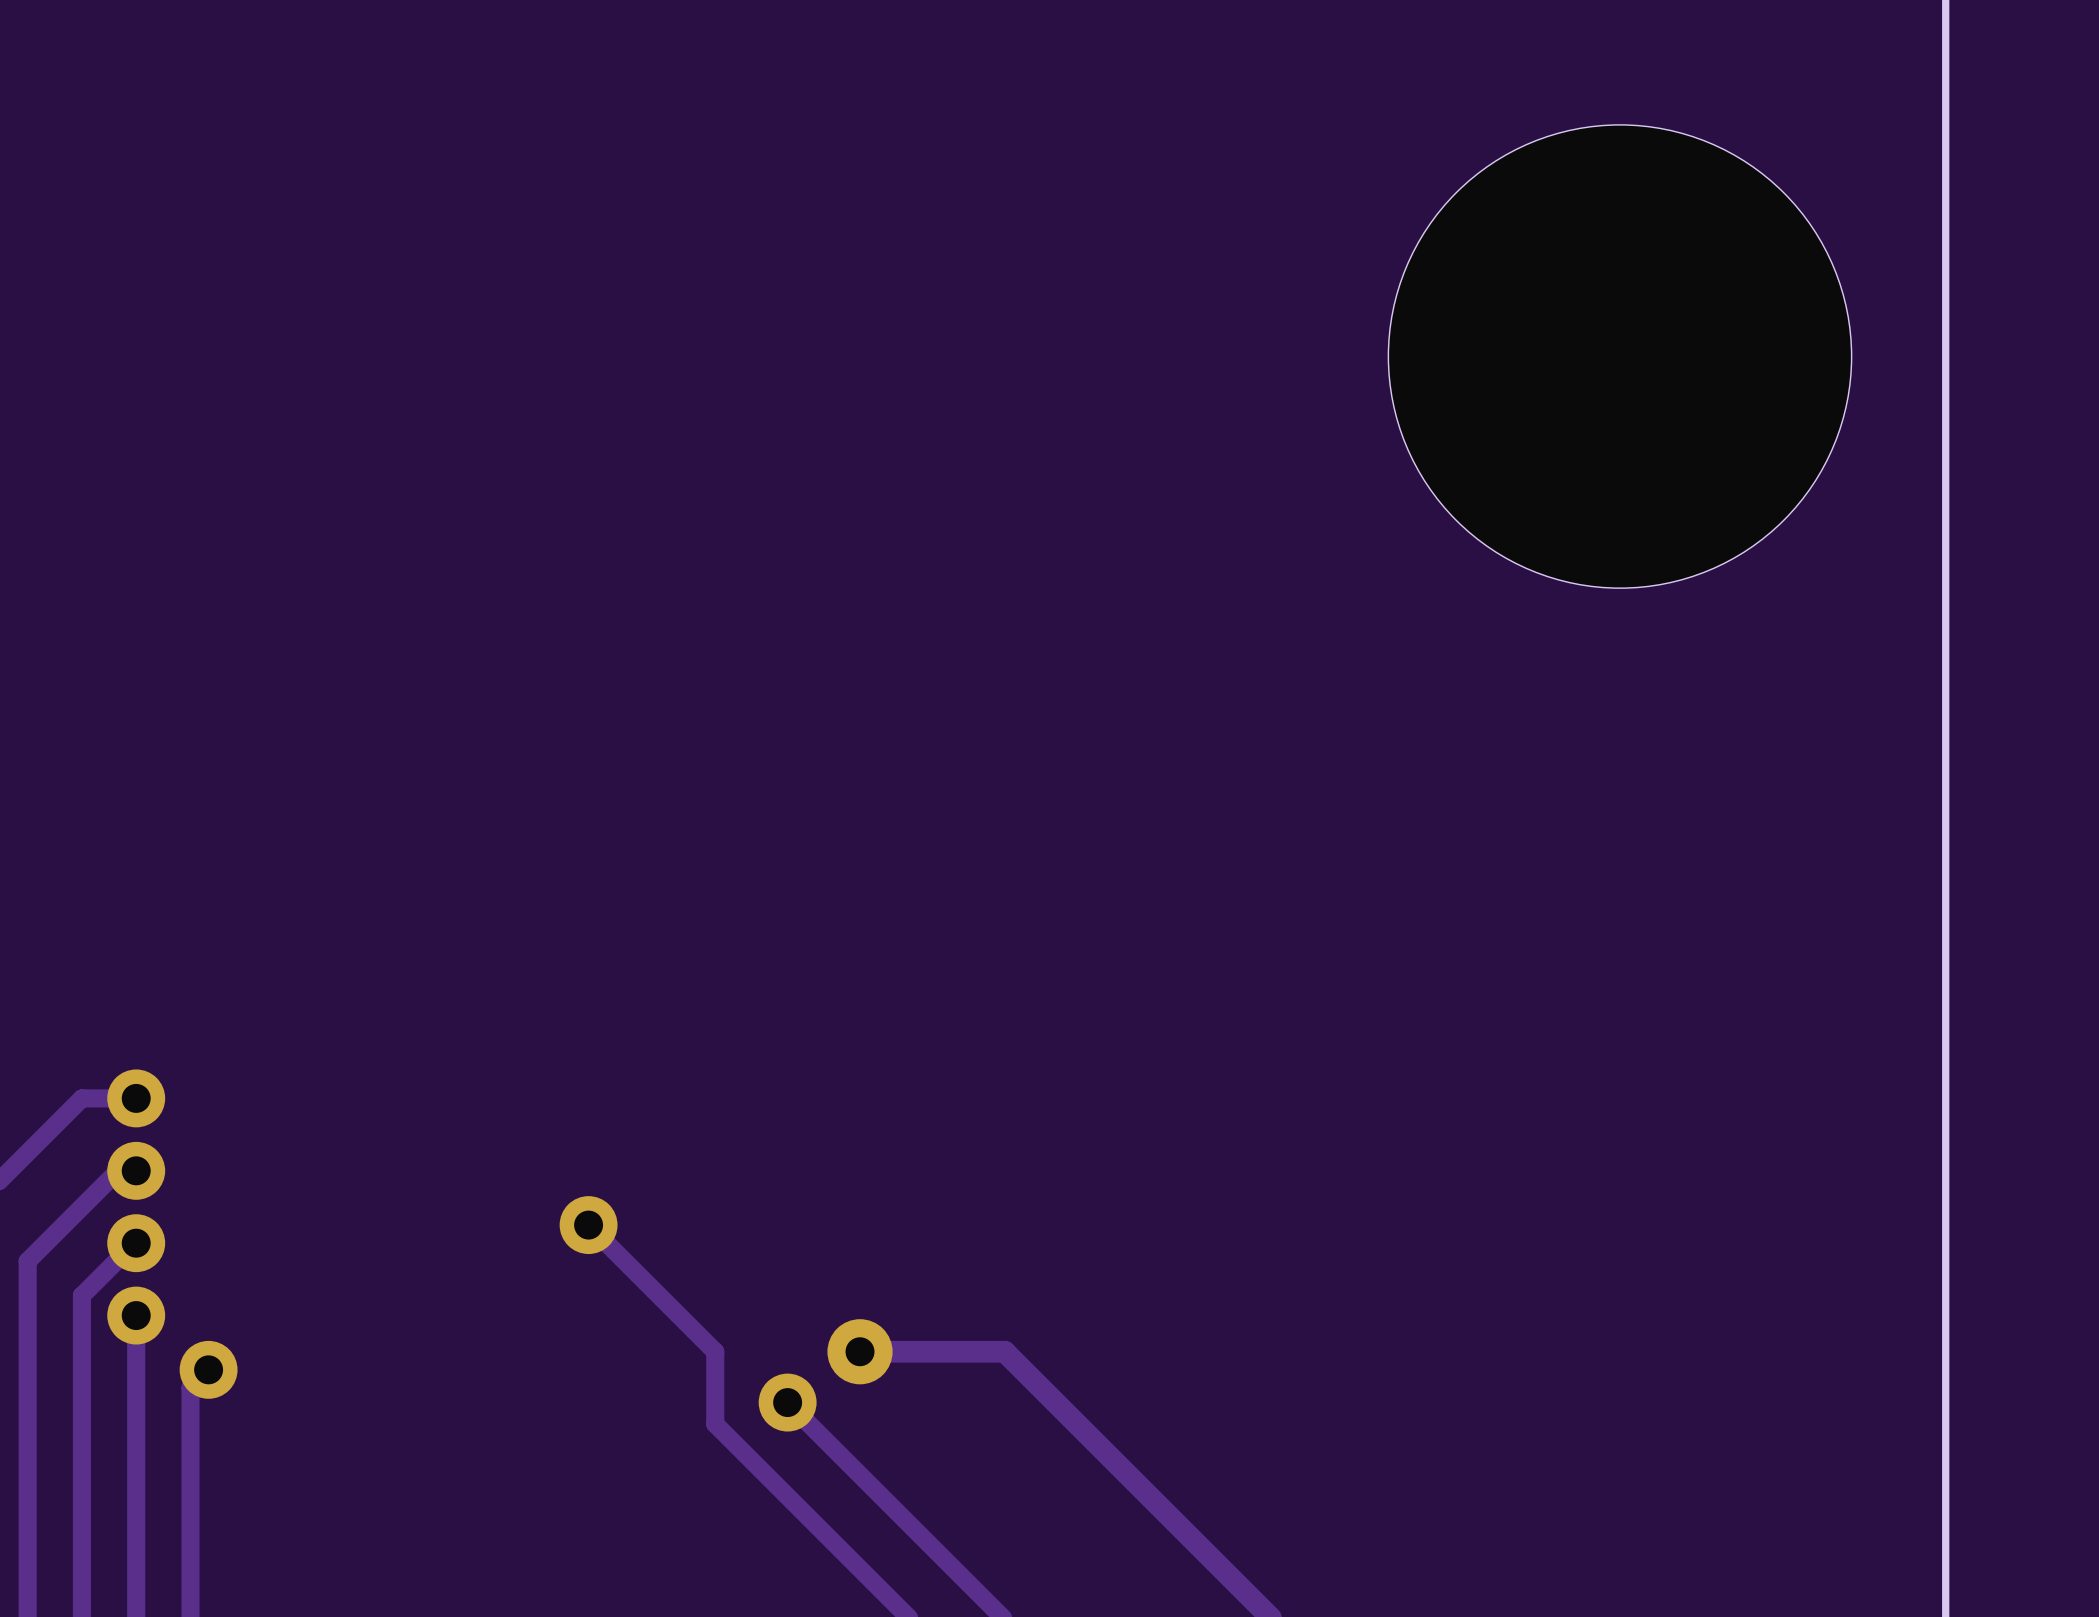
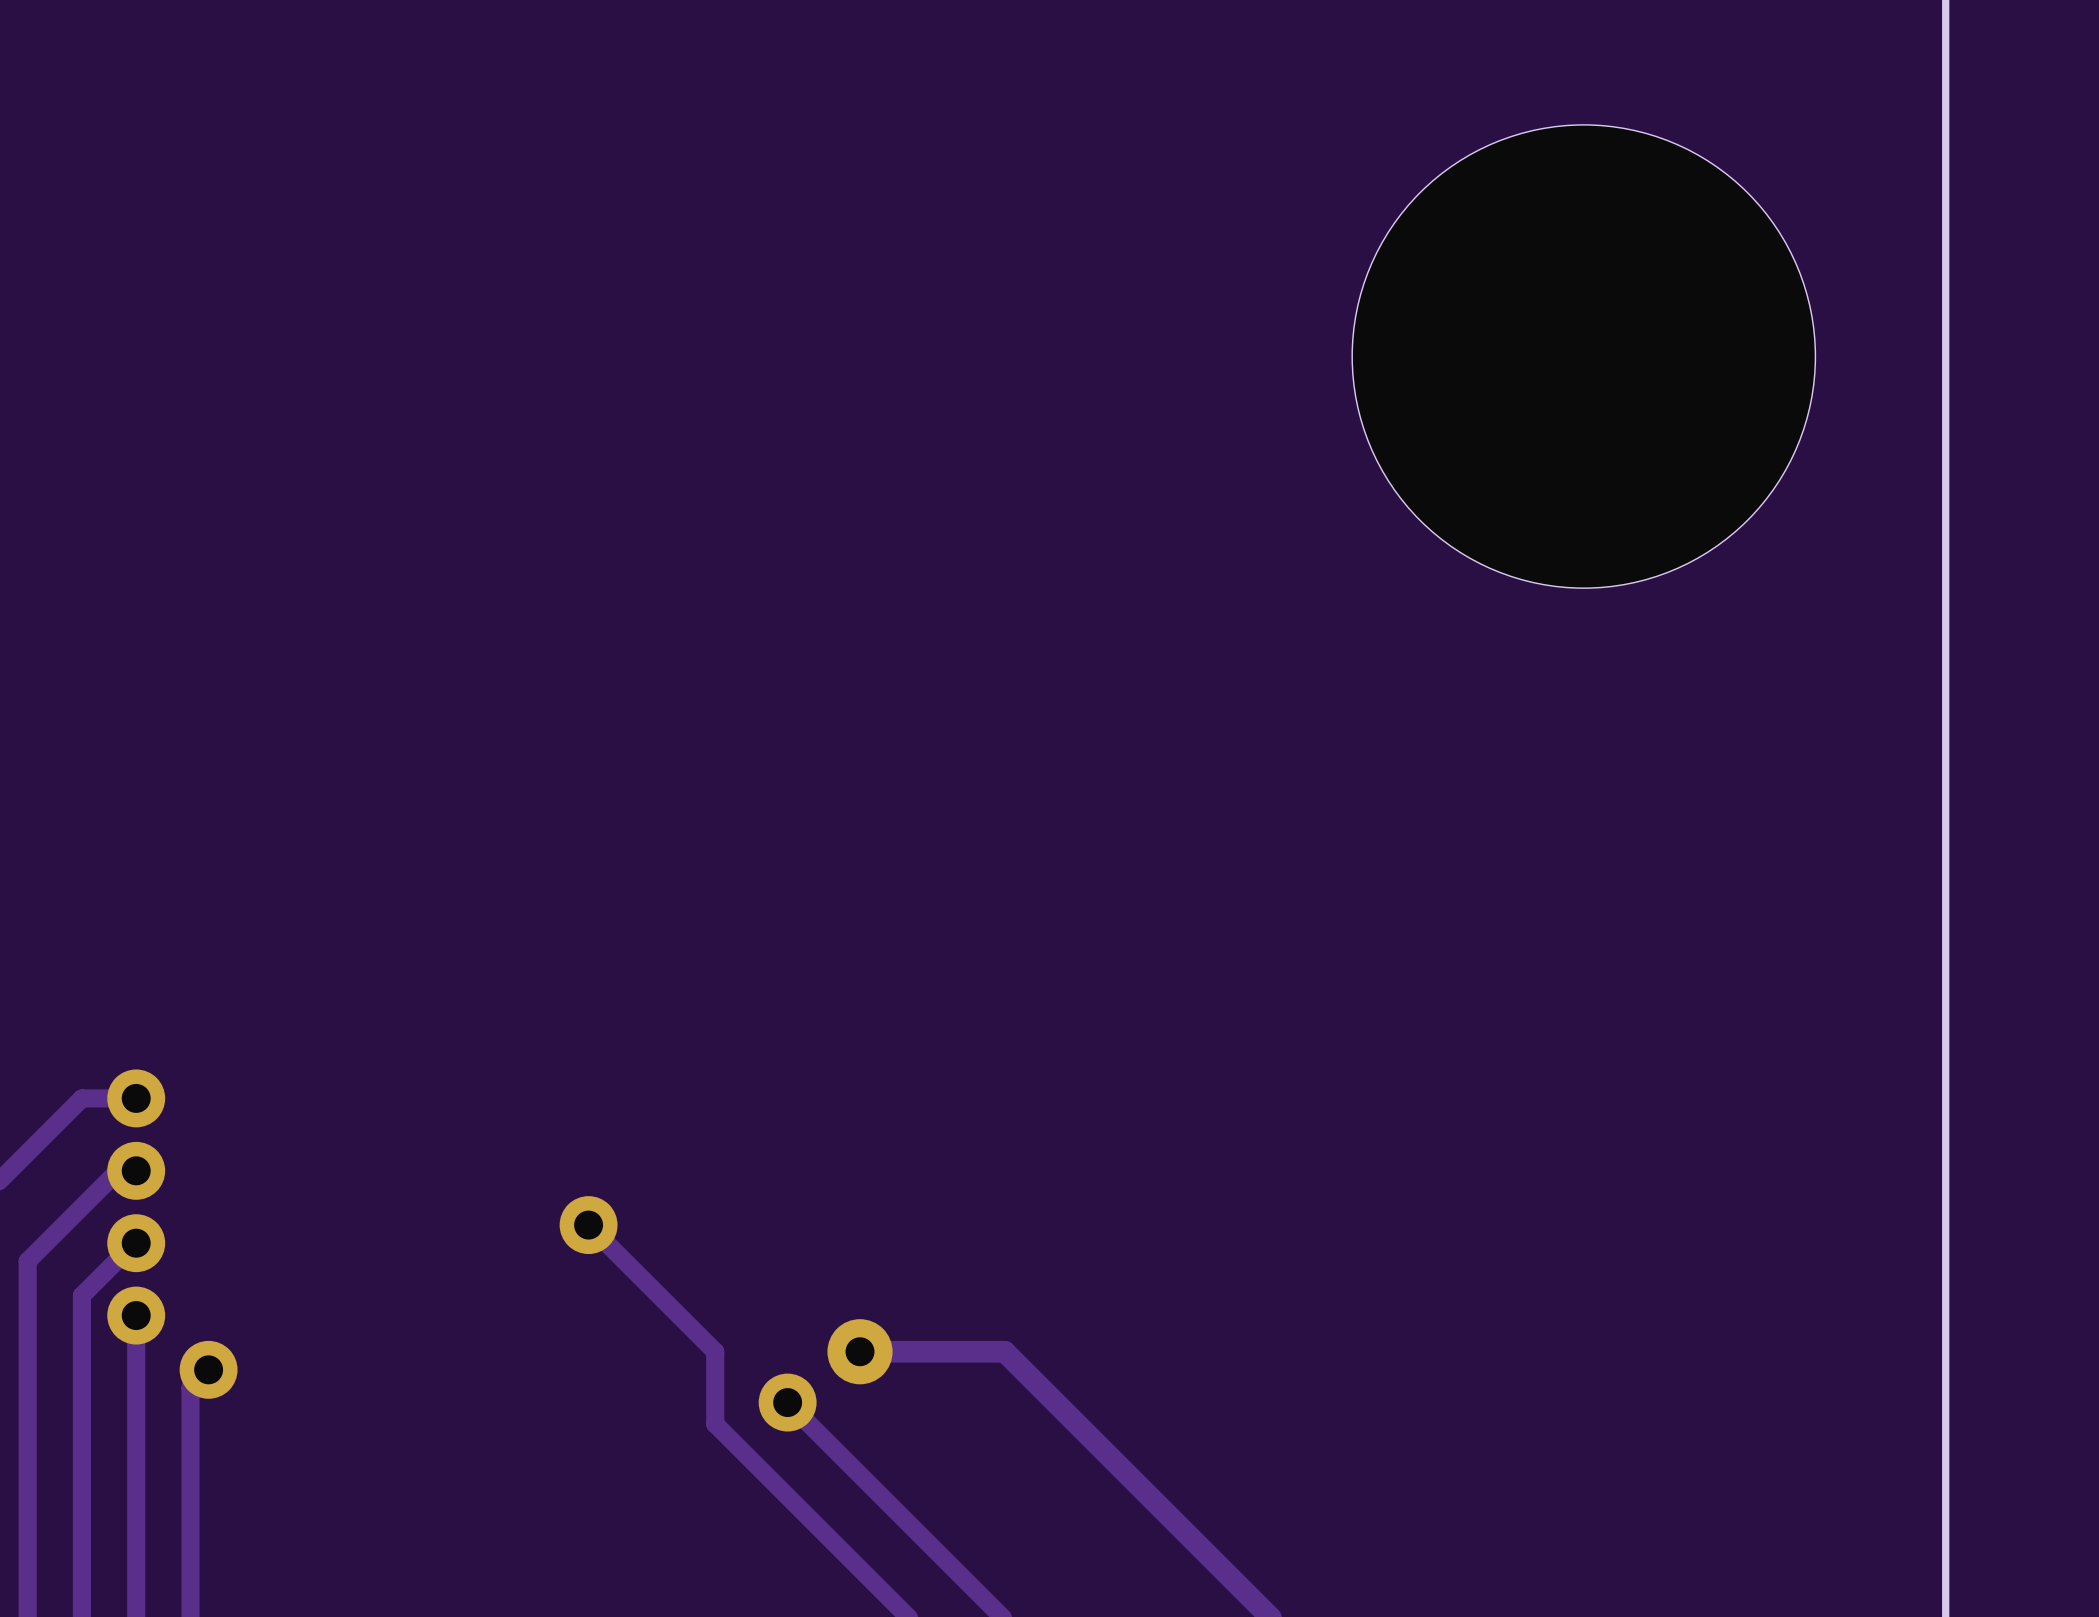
part position: (1620, 356) -> (1583, 356)

